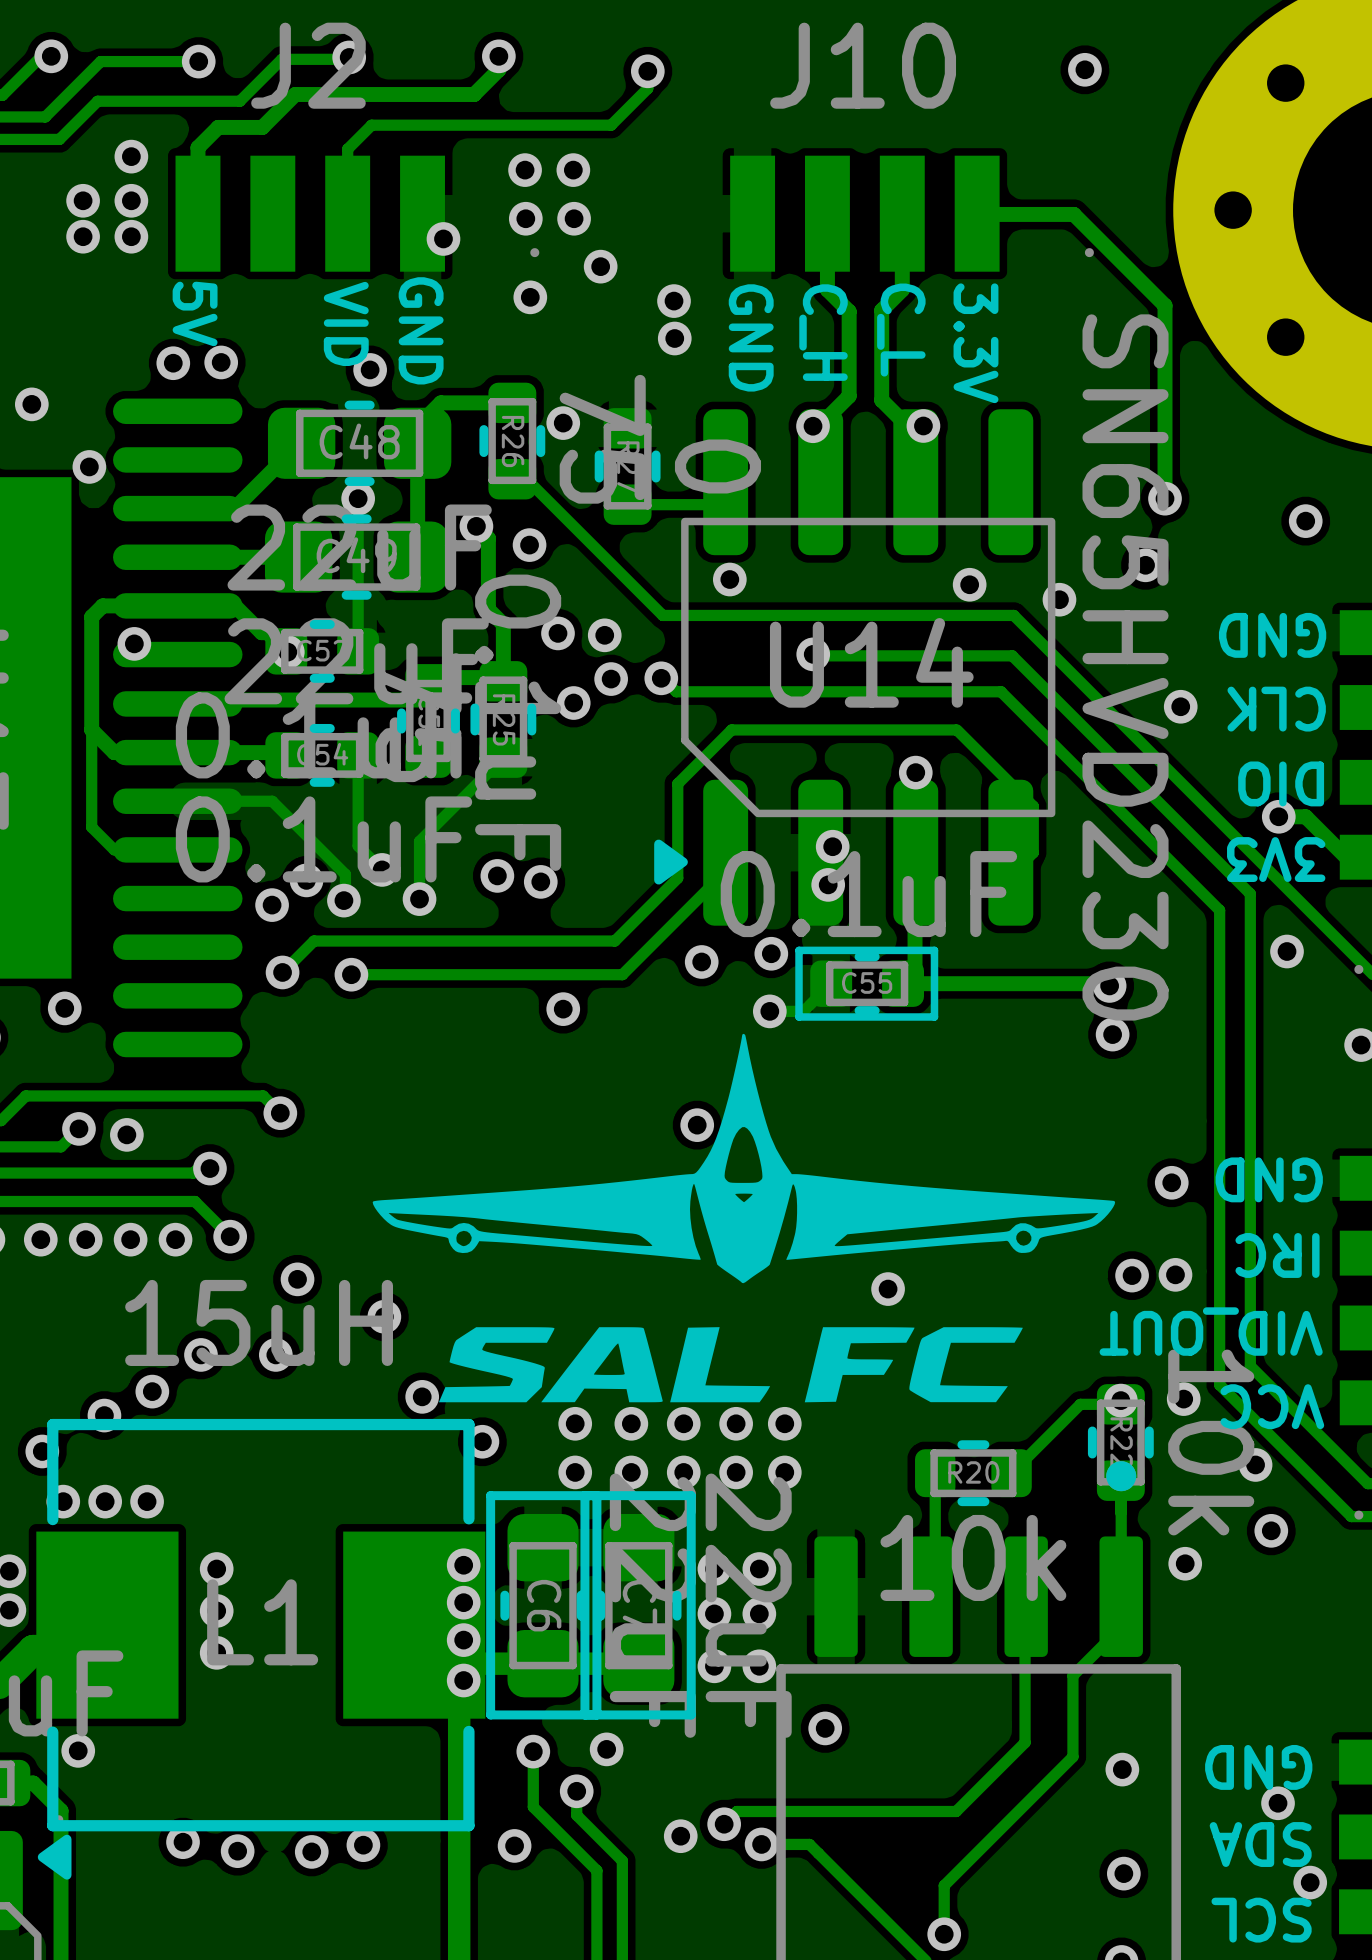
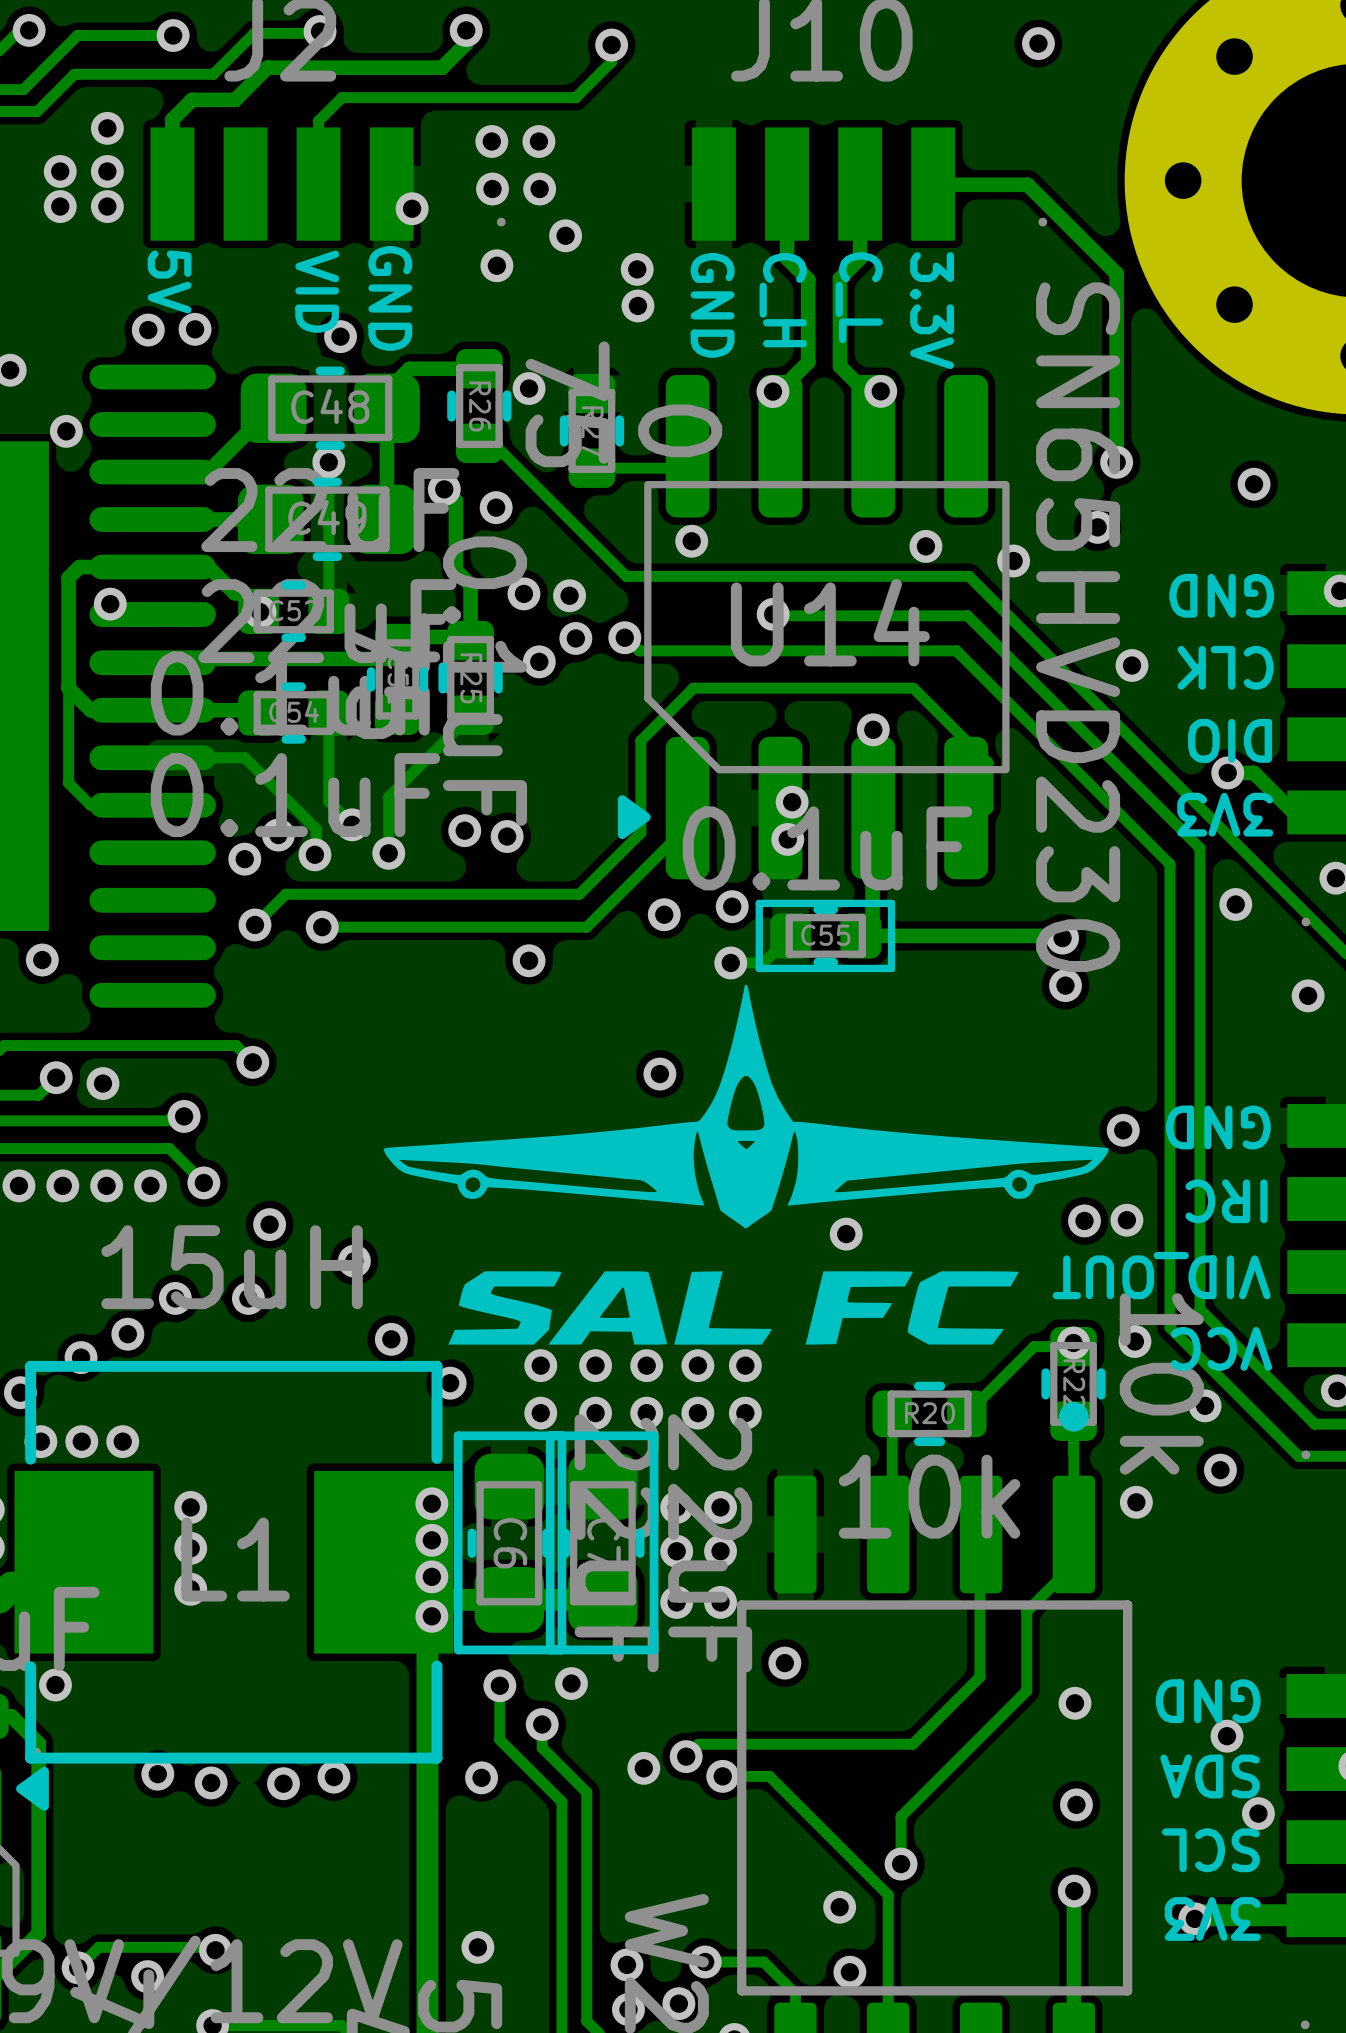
drawing position: (743, 1218) -> (746, 1164)

